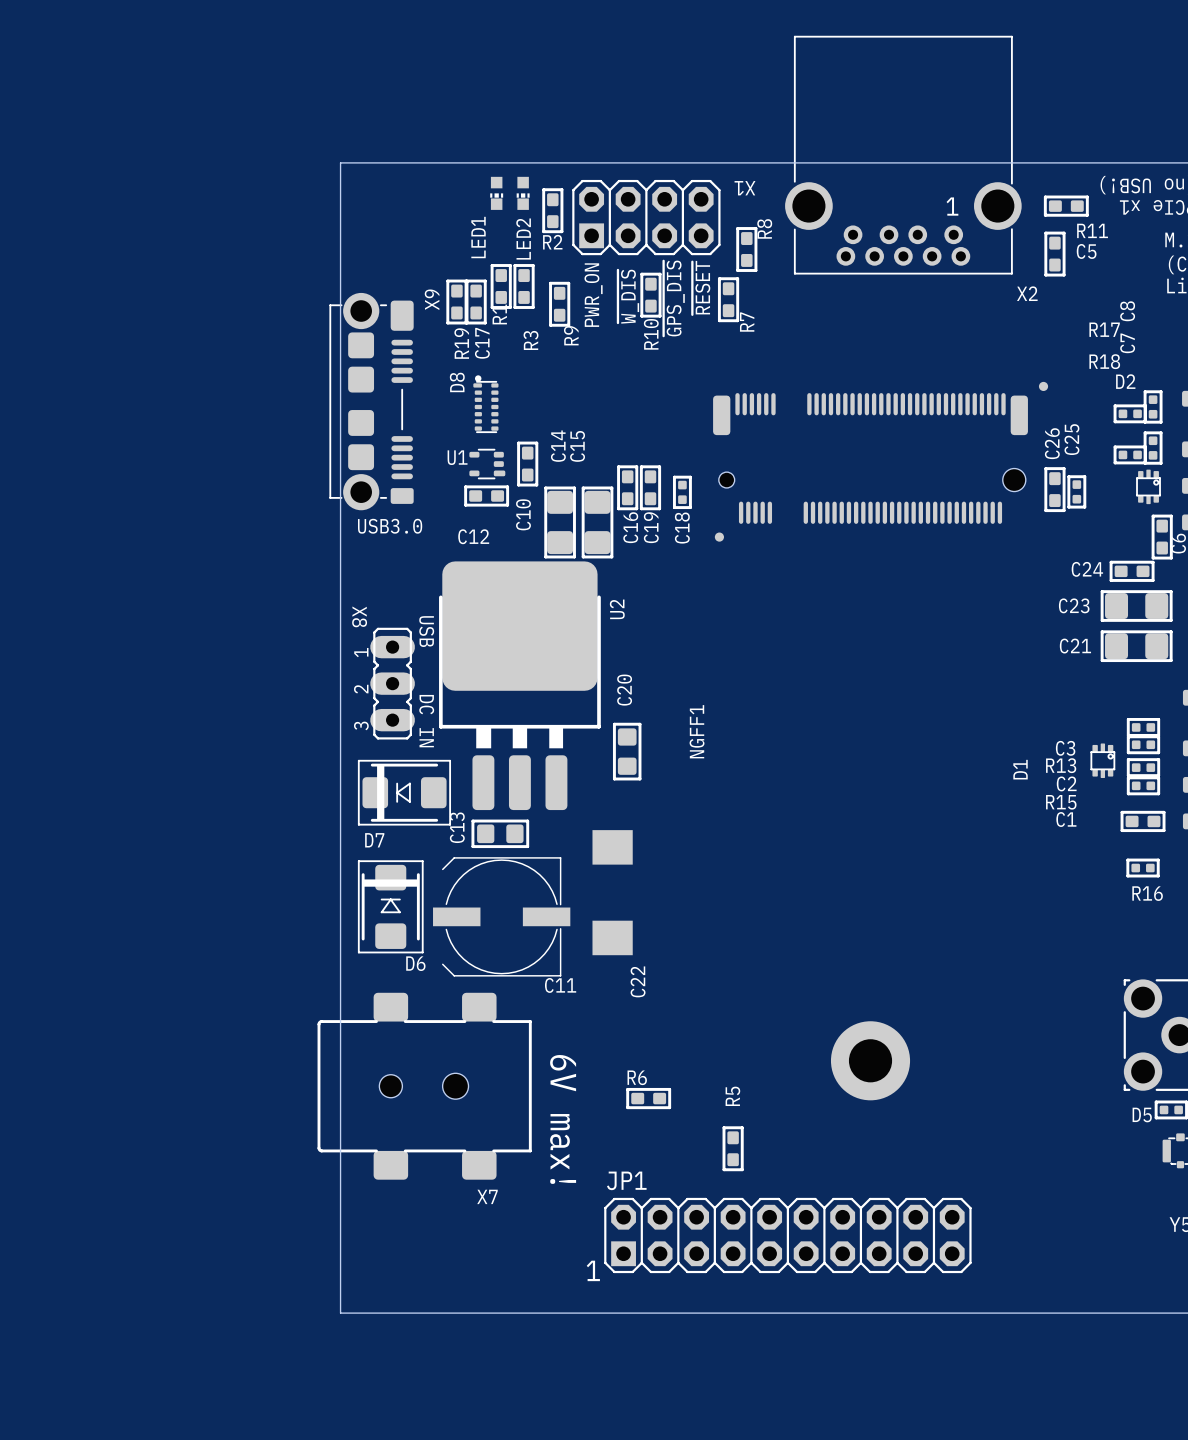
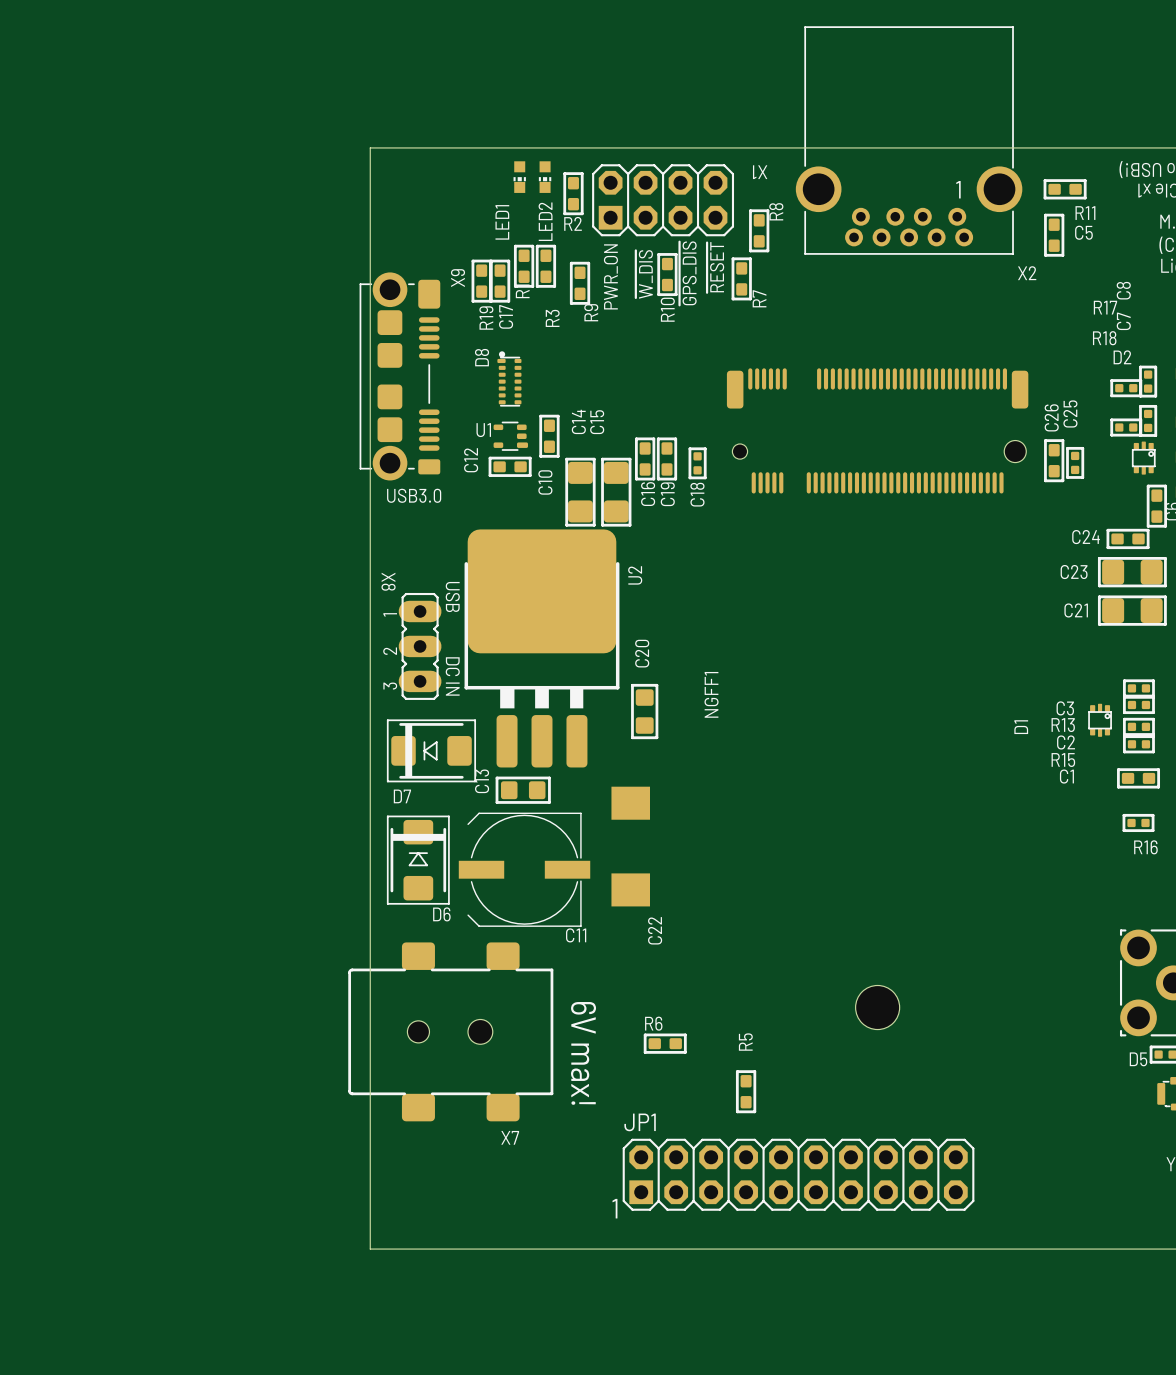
part: (1043, 386) -> none
NGFF1 footprint: [713, 393, 1028, 1101] -> [726, 368, 1029, 1030]
C12 name rotation: 0° (473, 536) -> 90° counterclockwise (471, 460)
C12 name position: C12 (473, 536) -> C12 (471, 460)
part: (719, 537) -> none

